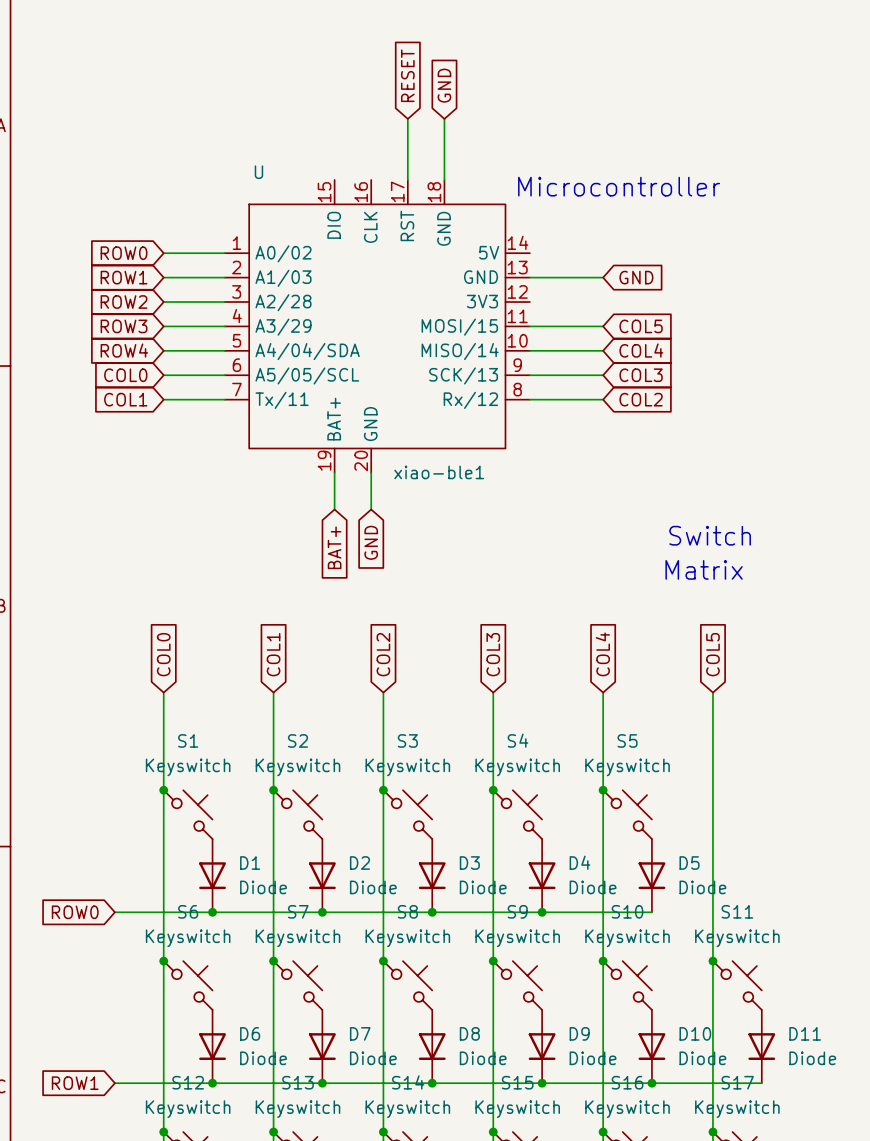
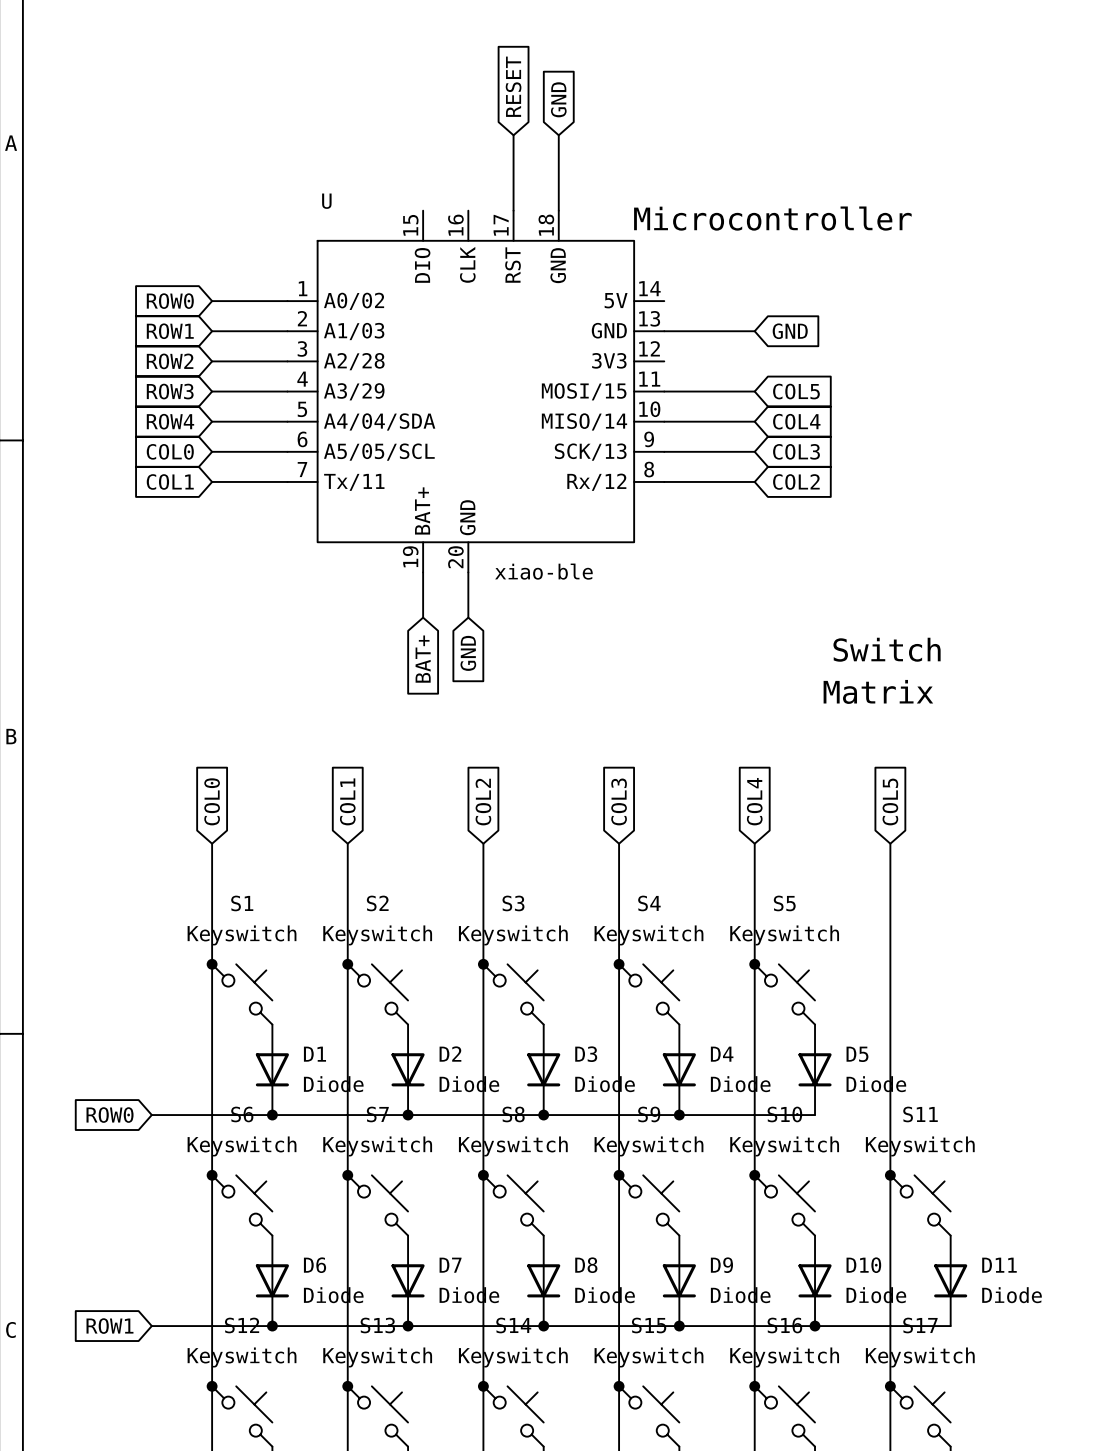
xiao-ble1 name: xiao-ble1 (439, 472) -> xiao-ble (543, 571)

